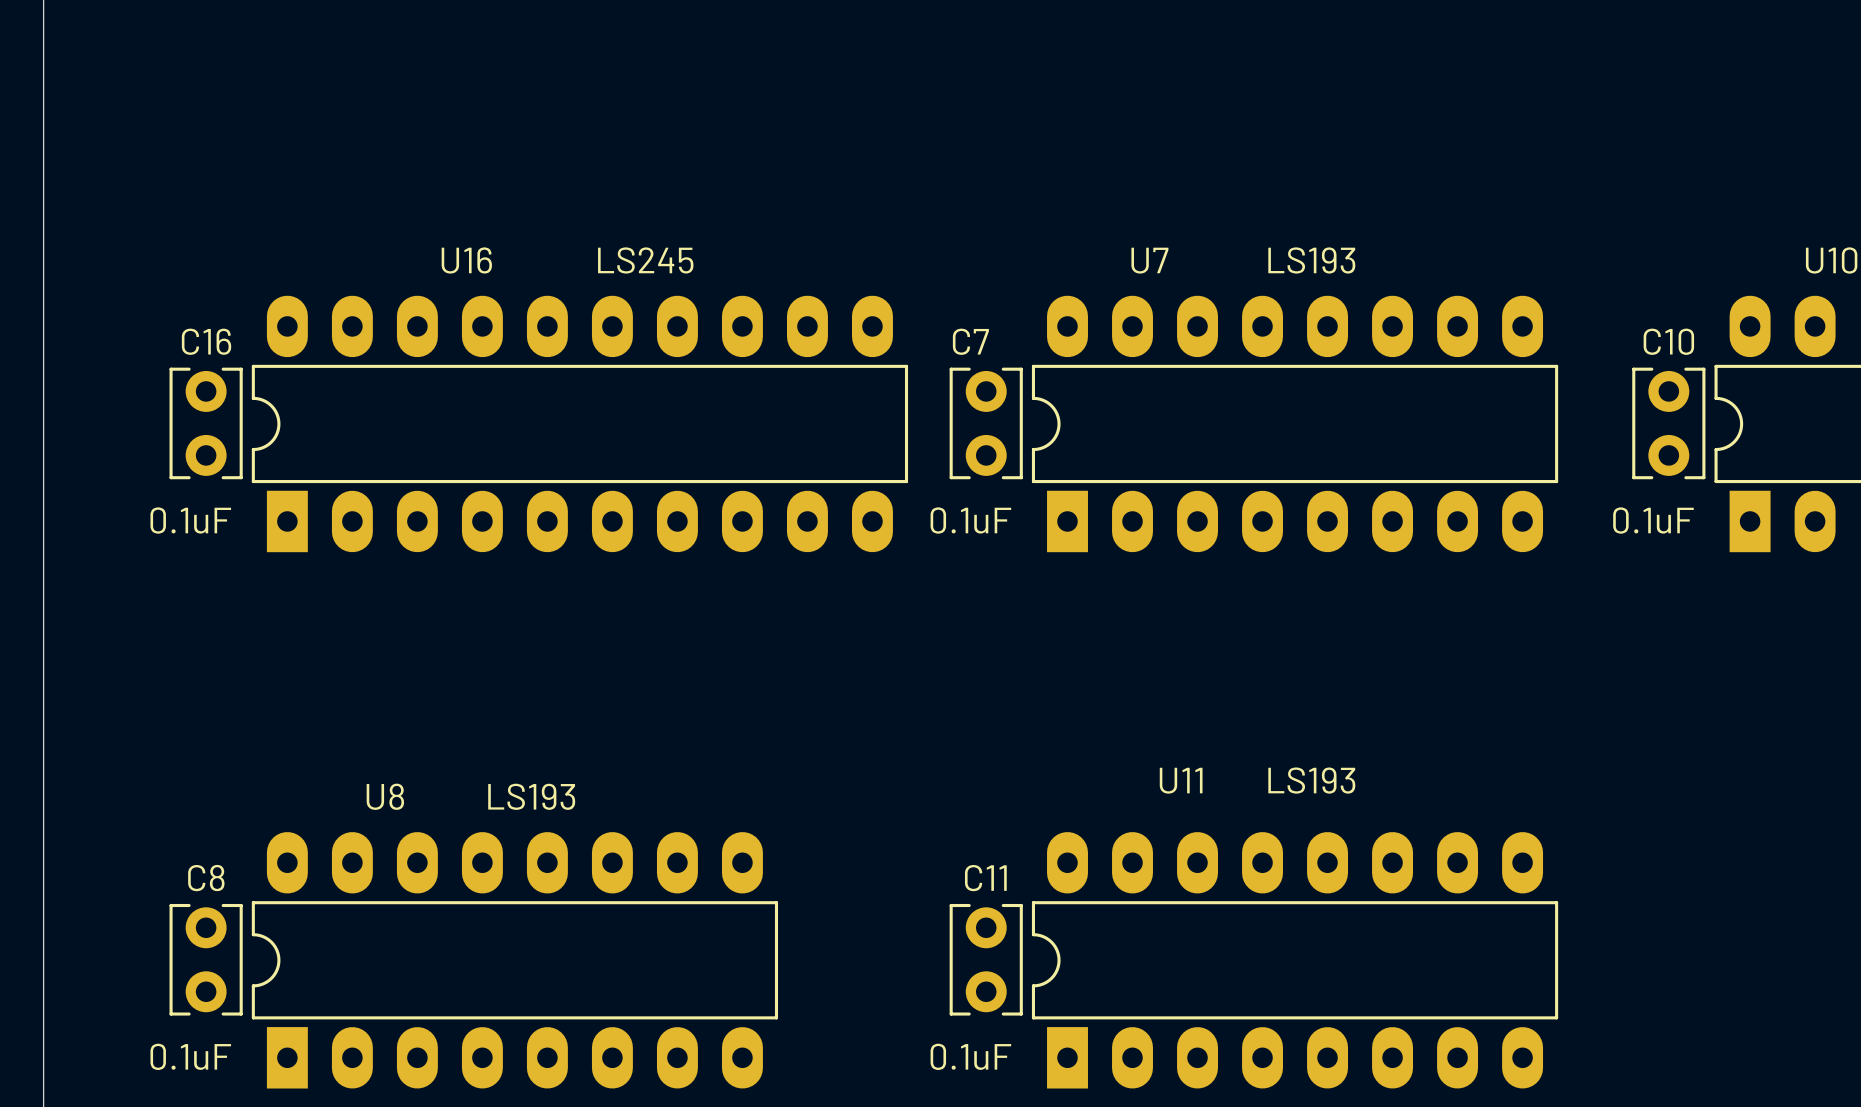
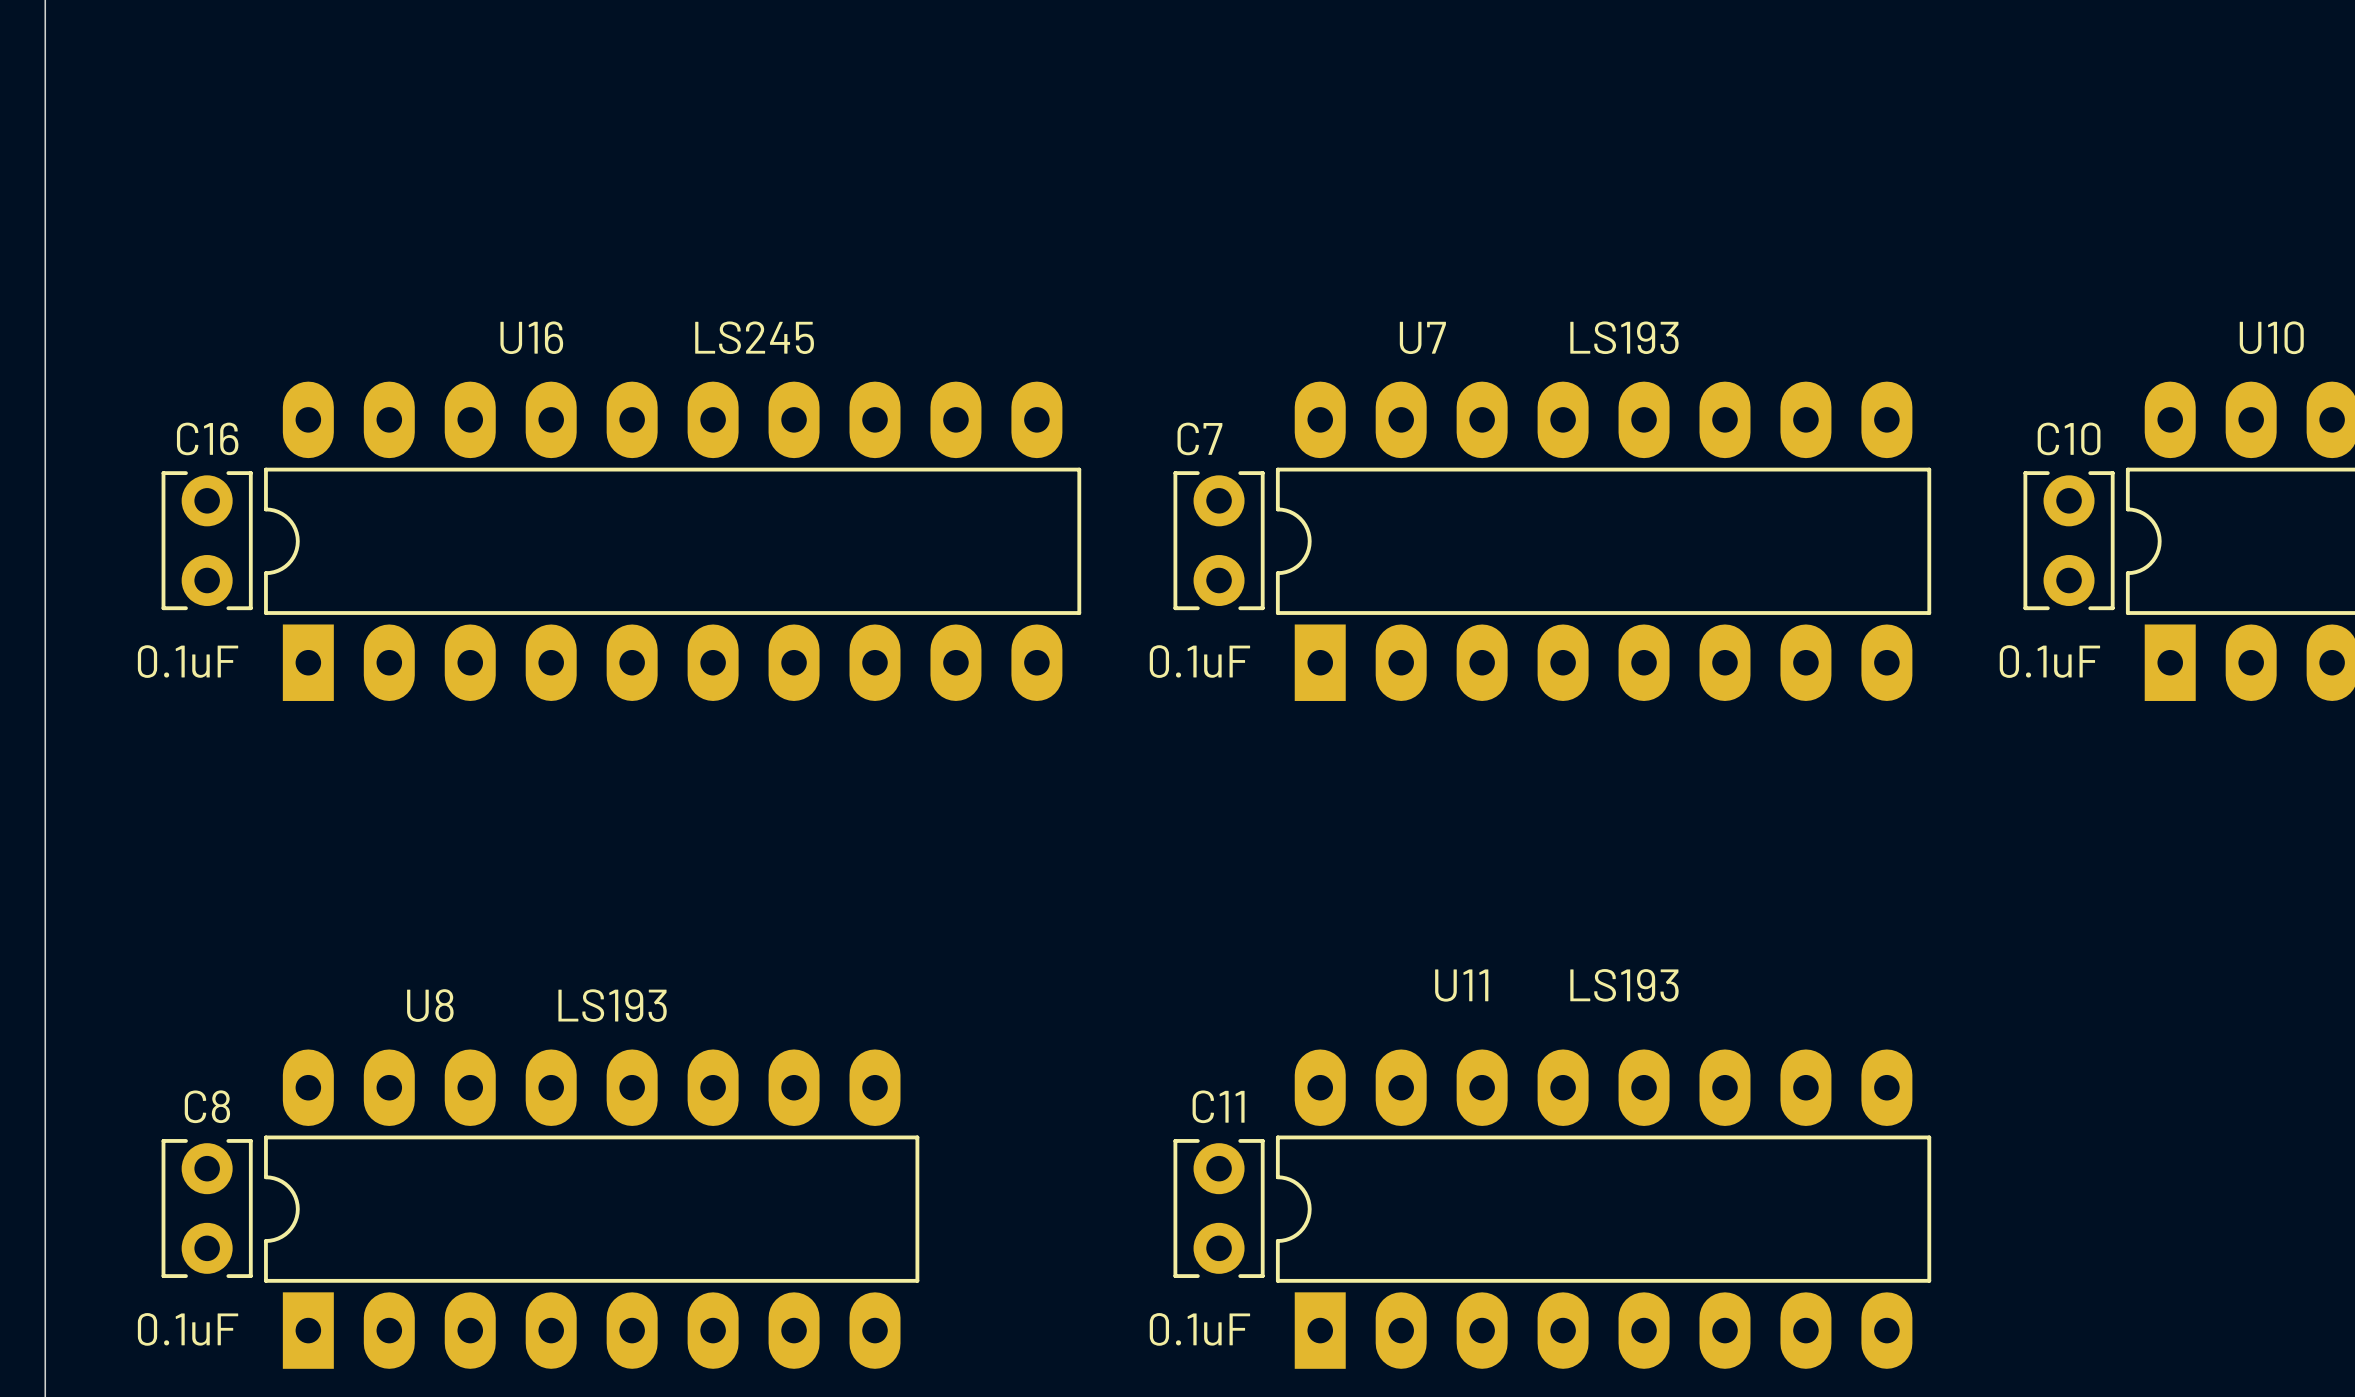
text position: LS245 (645, 260) -> LS245 (754, 337)
C16 position: (206, 423) -> (207, 540)
U16 position: (579, 423) -> (672, 541)
text position: 0.1uF (190, 520) -> 0.1uF (188, 661)
text position: LS193 (531, 796) -> LS193 (612, 1005)
C8 position: (206, 959) -> (207, 1208)
U8 position: (514, 960) -> (591, 1209)
text position: 0.1uF (190, 1056) -> 0.1uF (188, 1329)

